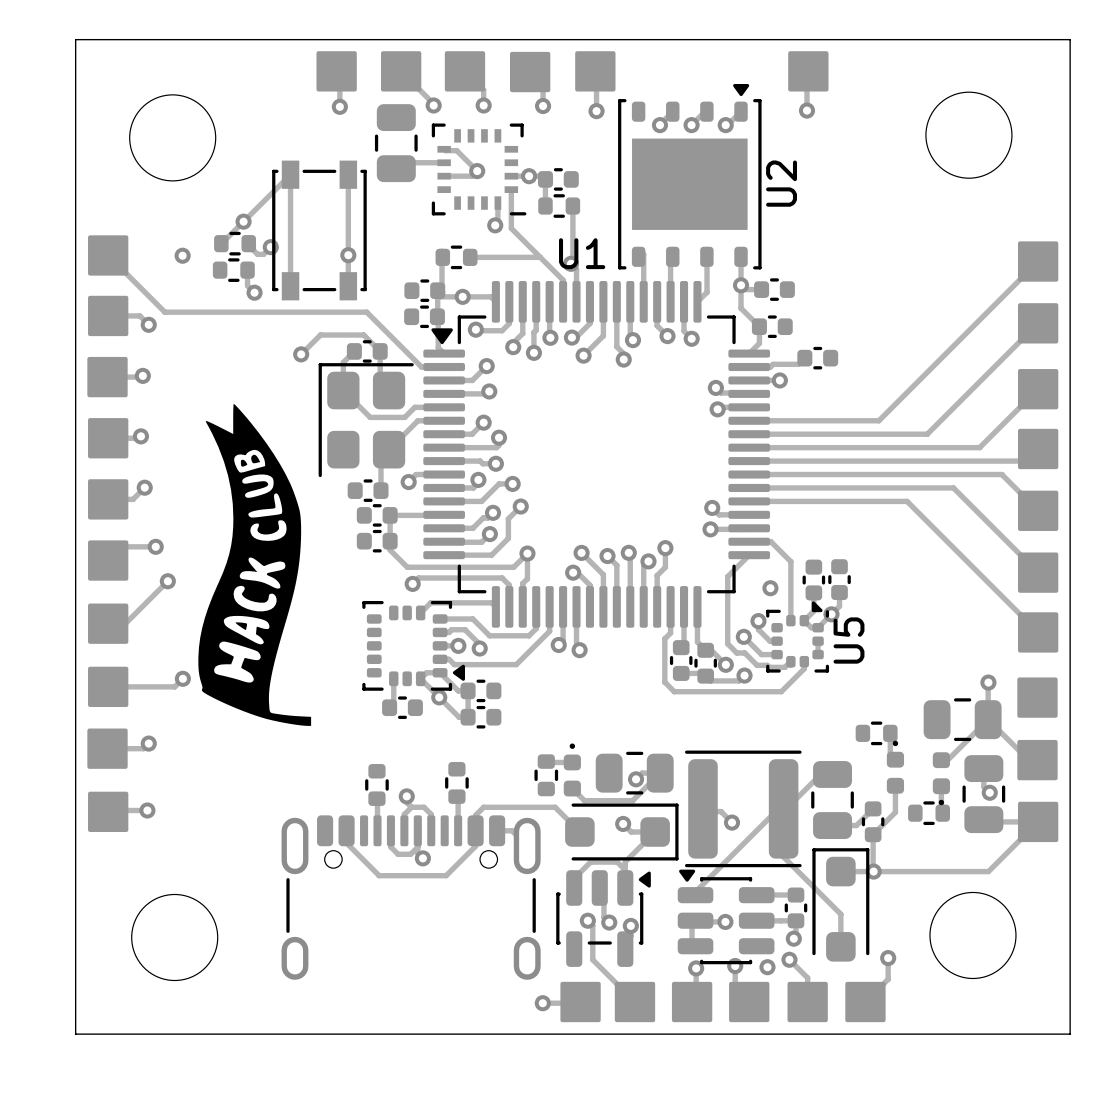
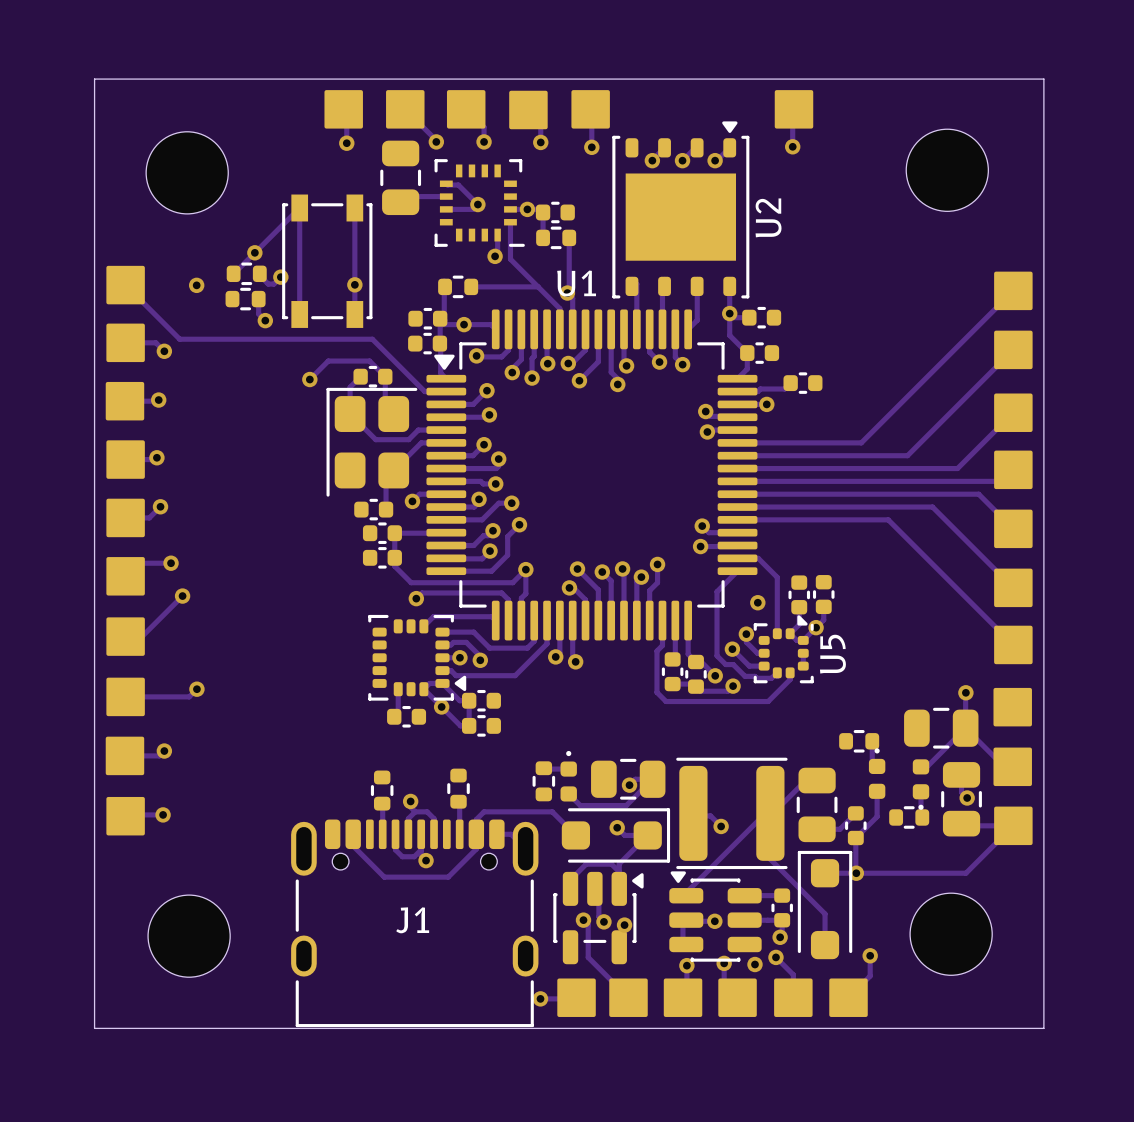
drawing: [198, 403, 312, 726] -> none
J1: none -> (414, 923)

